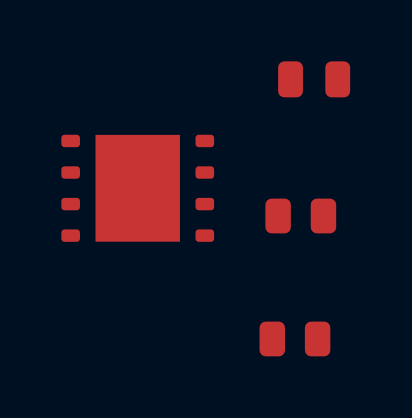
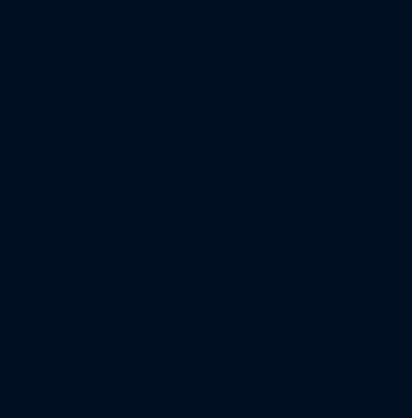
part: (314, 79) -> none
part: (137, 188) -> none
part: (300, 215) -> none
part: (294, 338) -> none

